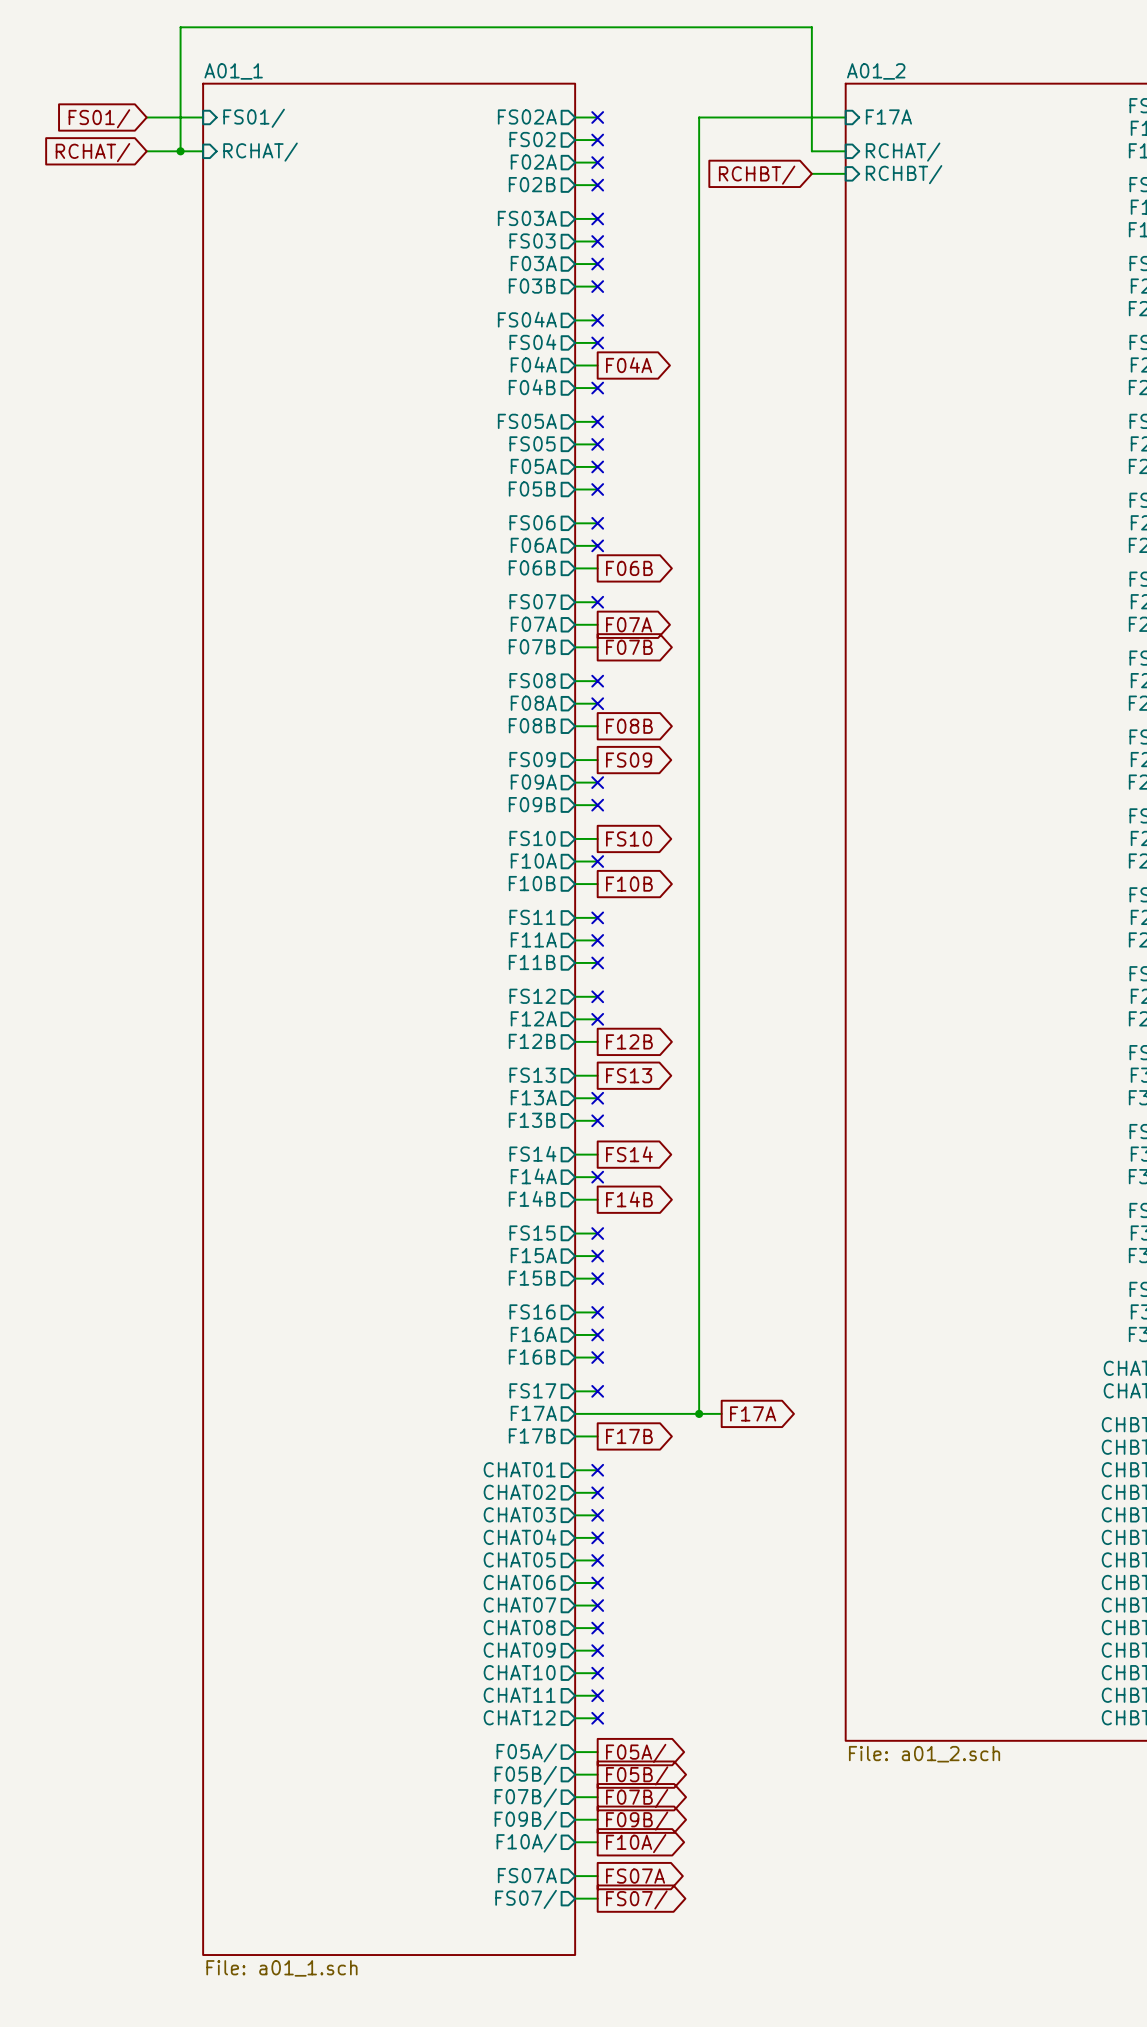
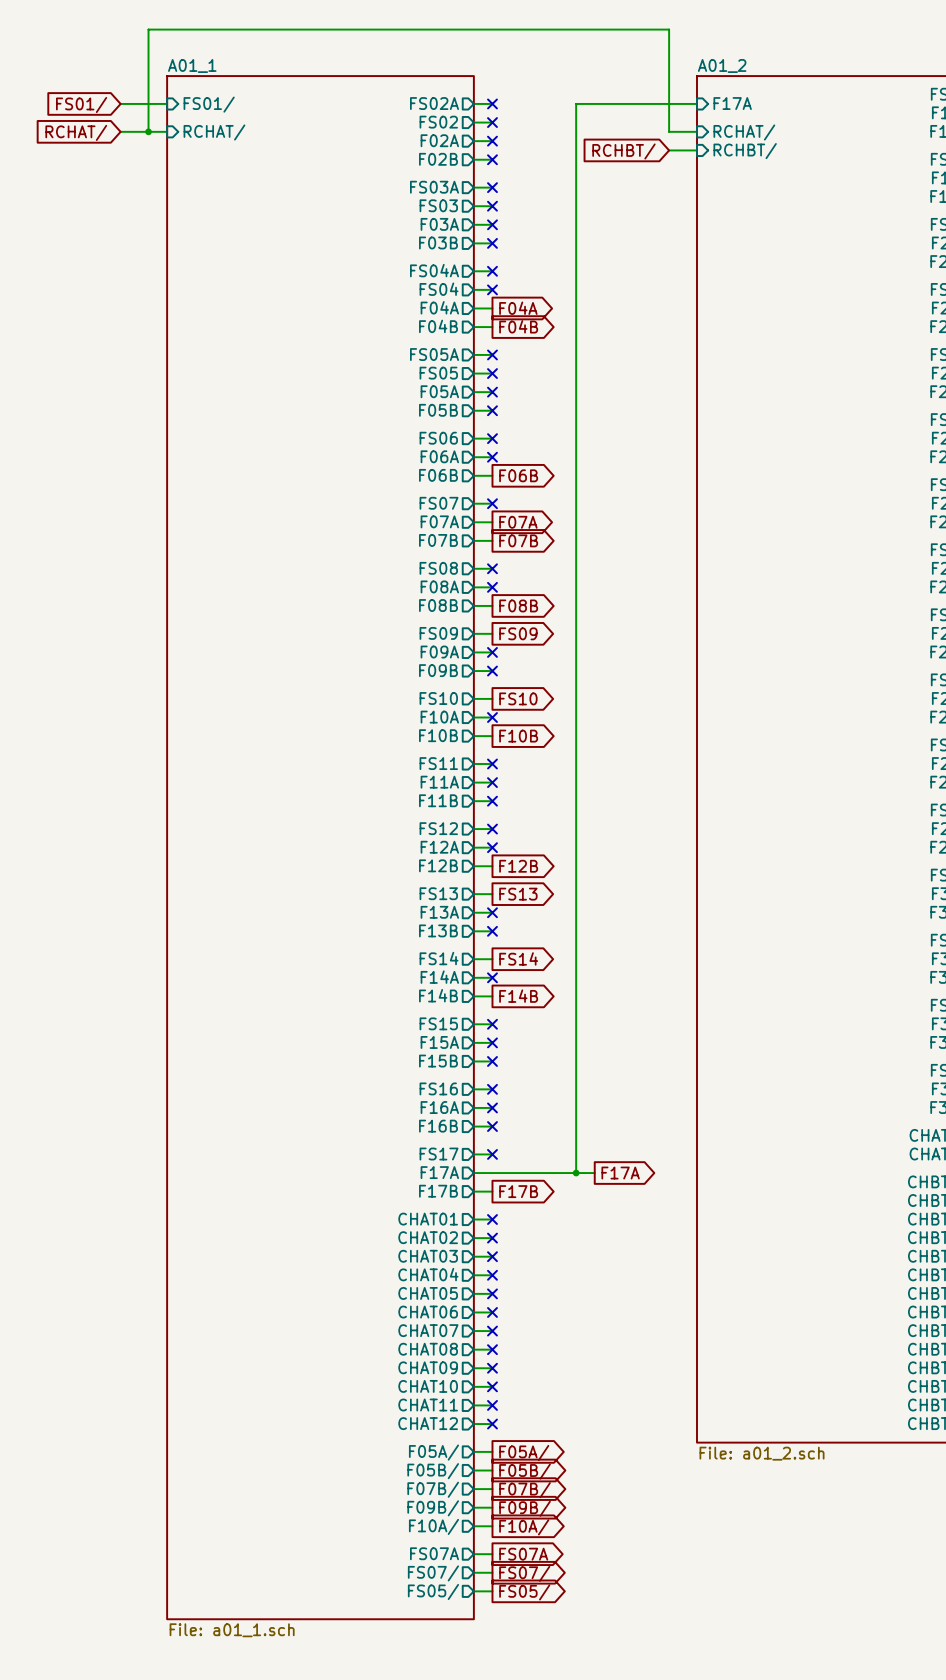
global label: none -> F04B (518, 326)
no-connect mark: (597, 388) -> none
sheet pin: none -> FS05/ (433, 1592)
wire: none -> (473, 1591) (492, 1591)
global label: none -> FS05/ (524, 1592)

